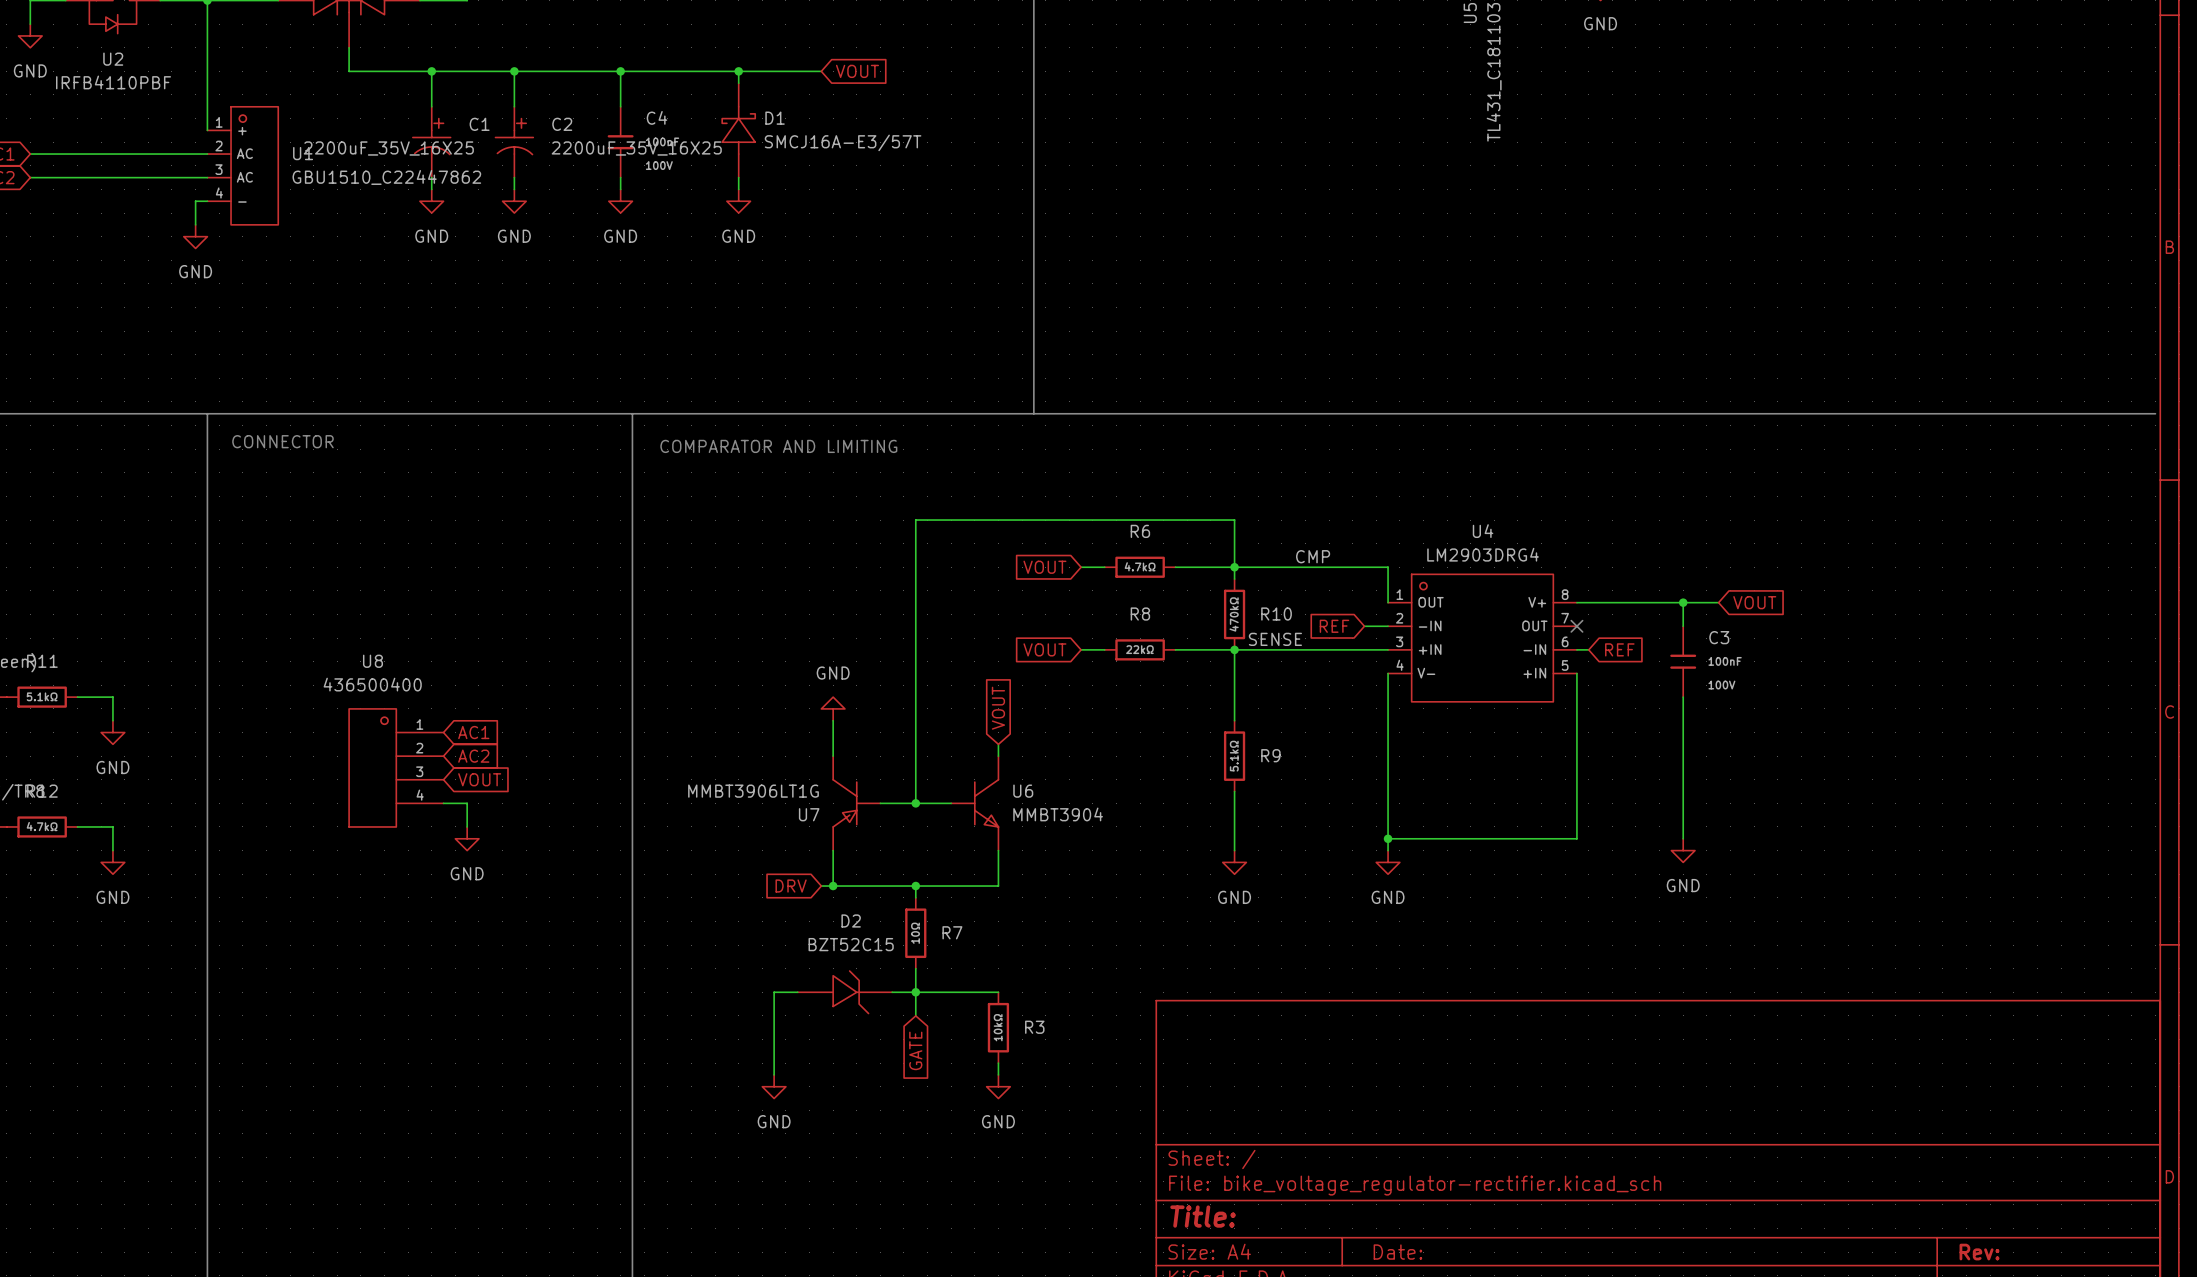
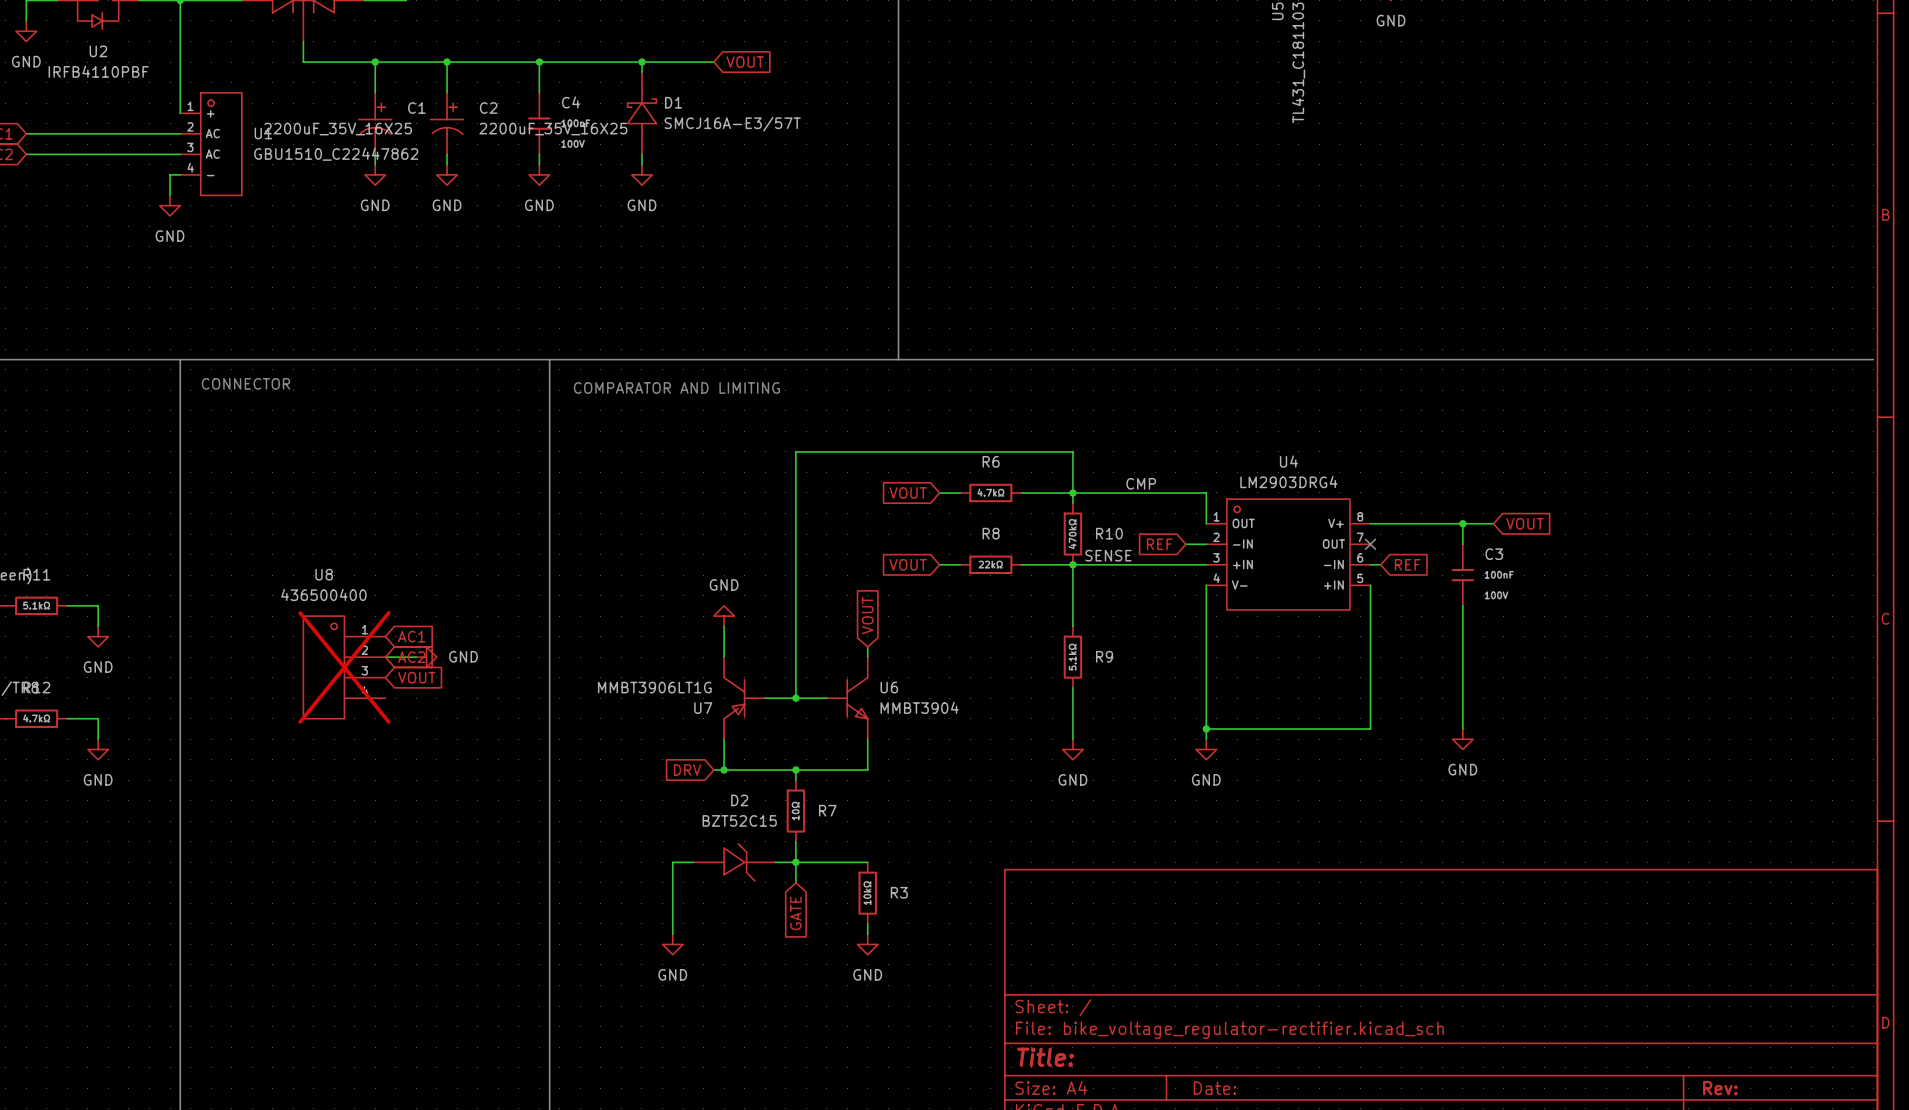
wire: none -> (385, 657) (416, 657)
U8 do-not-place cross: none -> (344, 667)
wire: (443, 803) (467, 803) (467, 826) -> none
power symbol rotation: 0° (467, 838) -> 90° counterclockwise (426, 657)
power symbol position: GND (467, 838) -> GND (426, 657)

